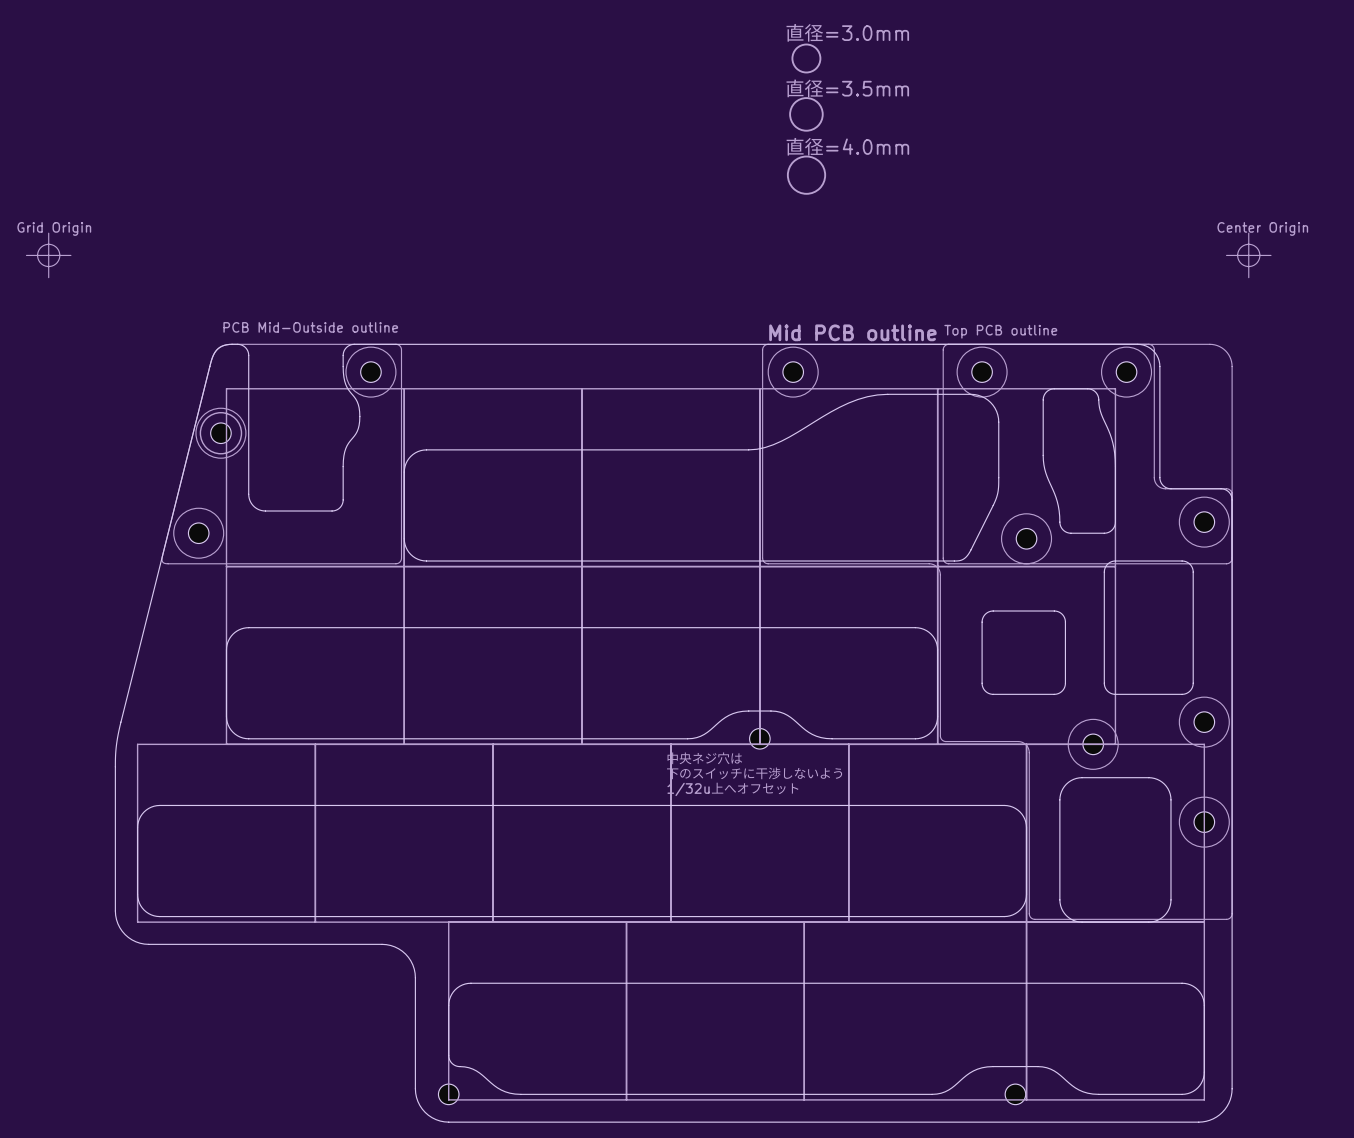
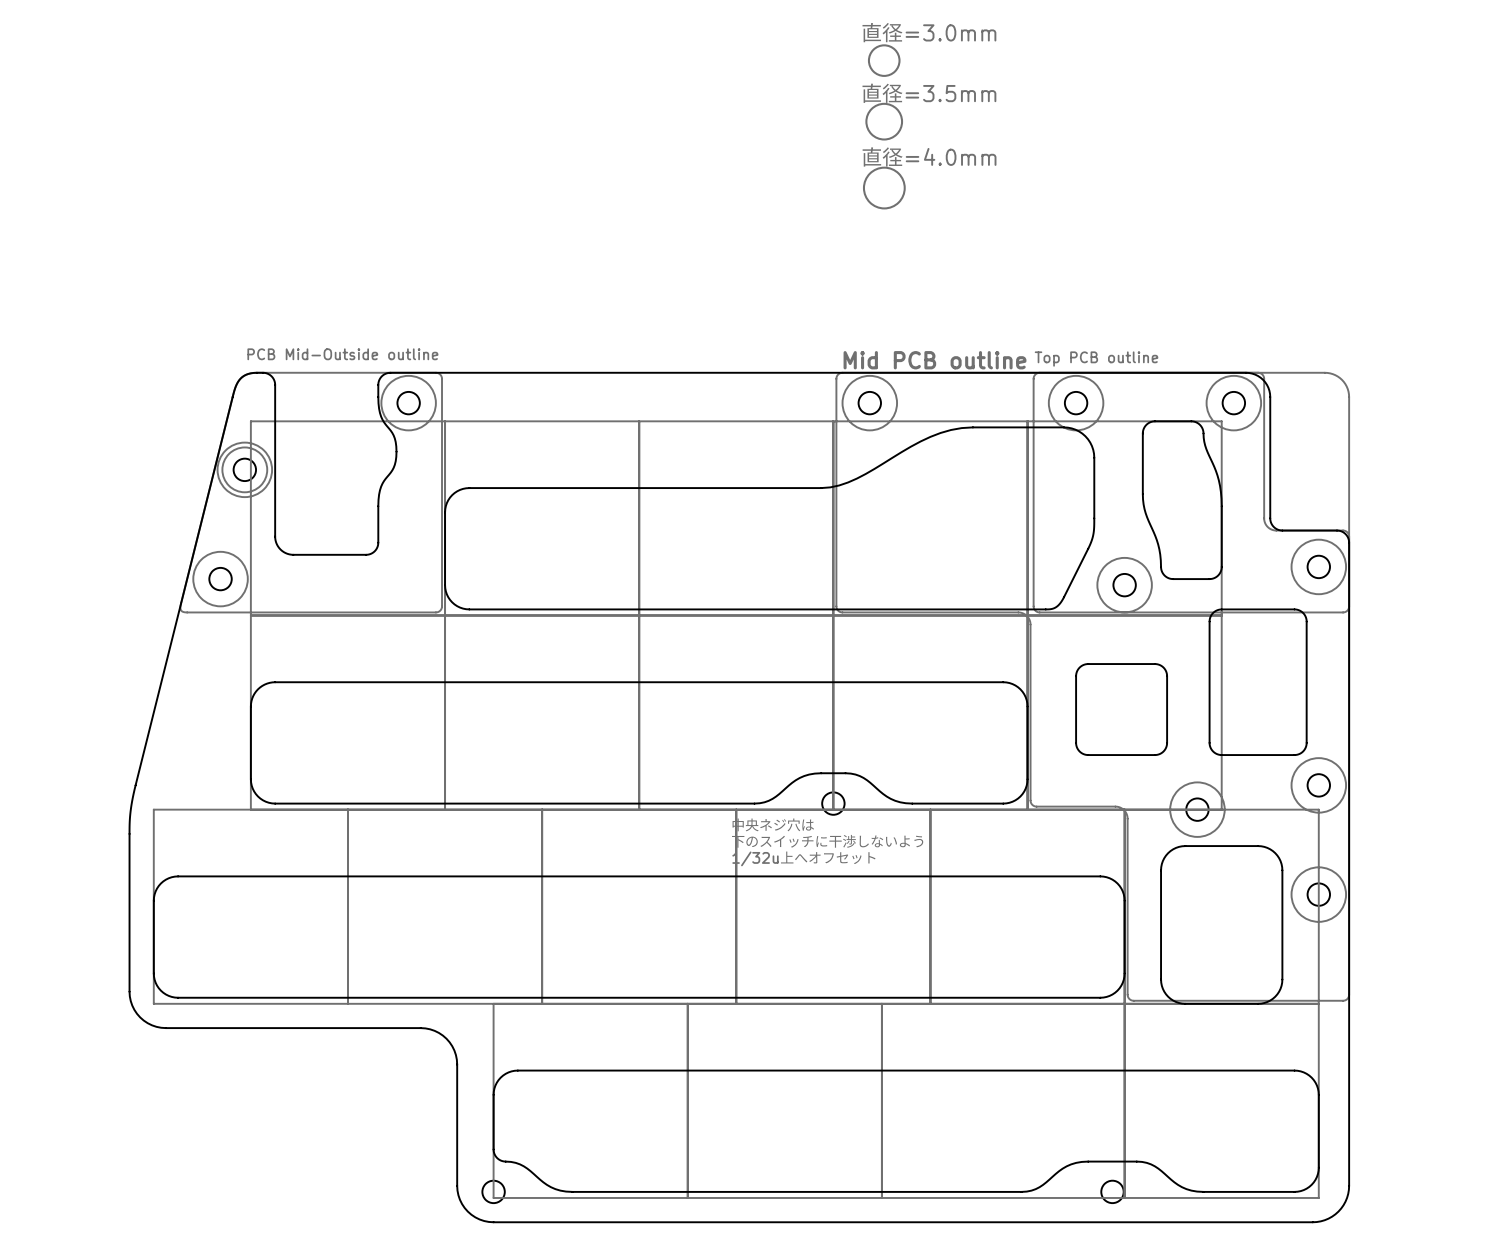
text: Grid Origin (54, 228) -> none
text: Center Origin (1262, 228) -> none
line: (48, 233) (48, 277) -> none
line: (1248, 233) (1248, 277) -> none
drawing: [37, 243, 61, 268] -> none
drawing: [1237, 243, 1261, 268] -> none
line: (26, 255) (70, 255) -> none
line: (1226, 255) (1270, 255) -> none

